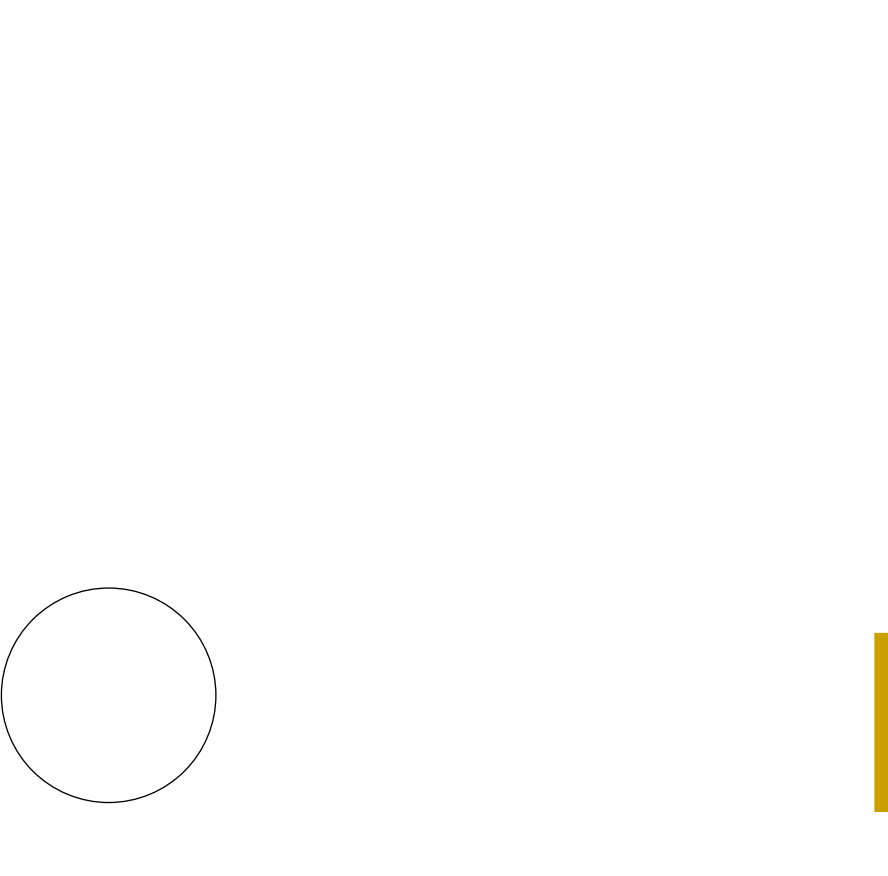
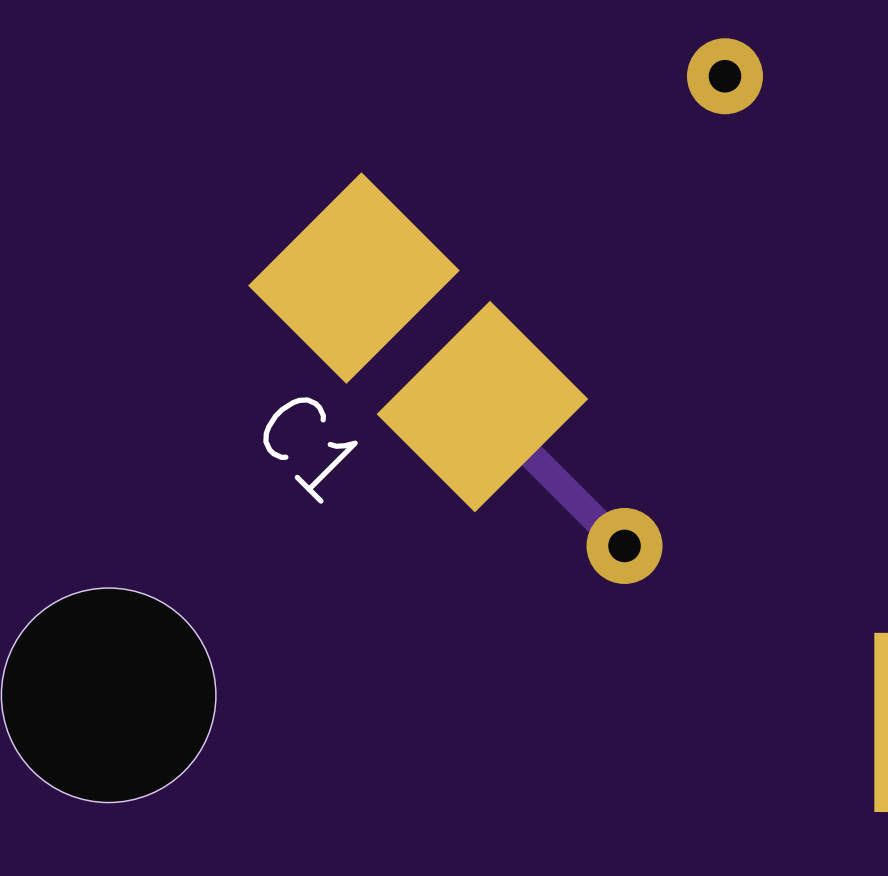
via: none -> (724, 76)
C1: none -> (418, 342)
track: none -> (482, 406) (621, 545) (624, 545)
via: none -> (624, 545)

